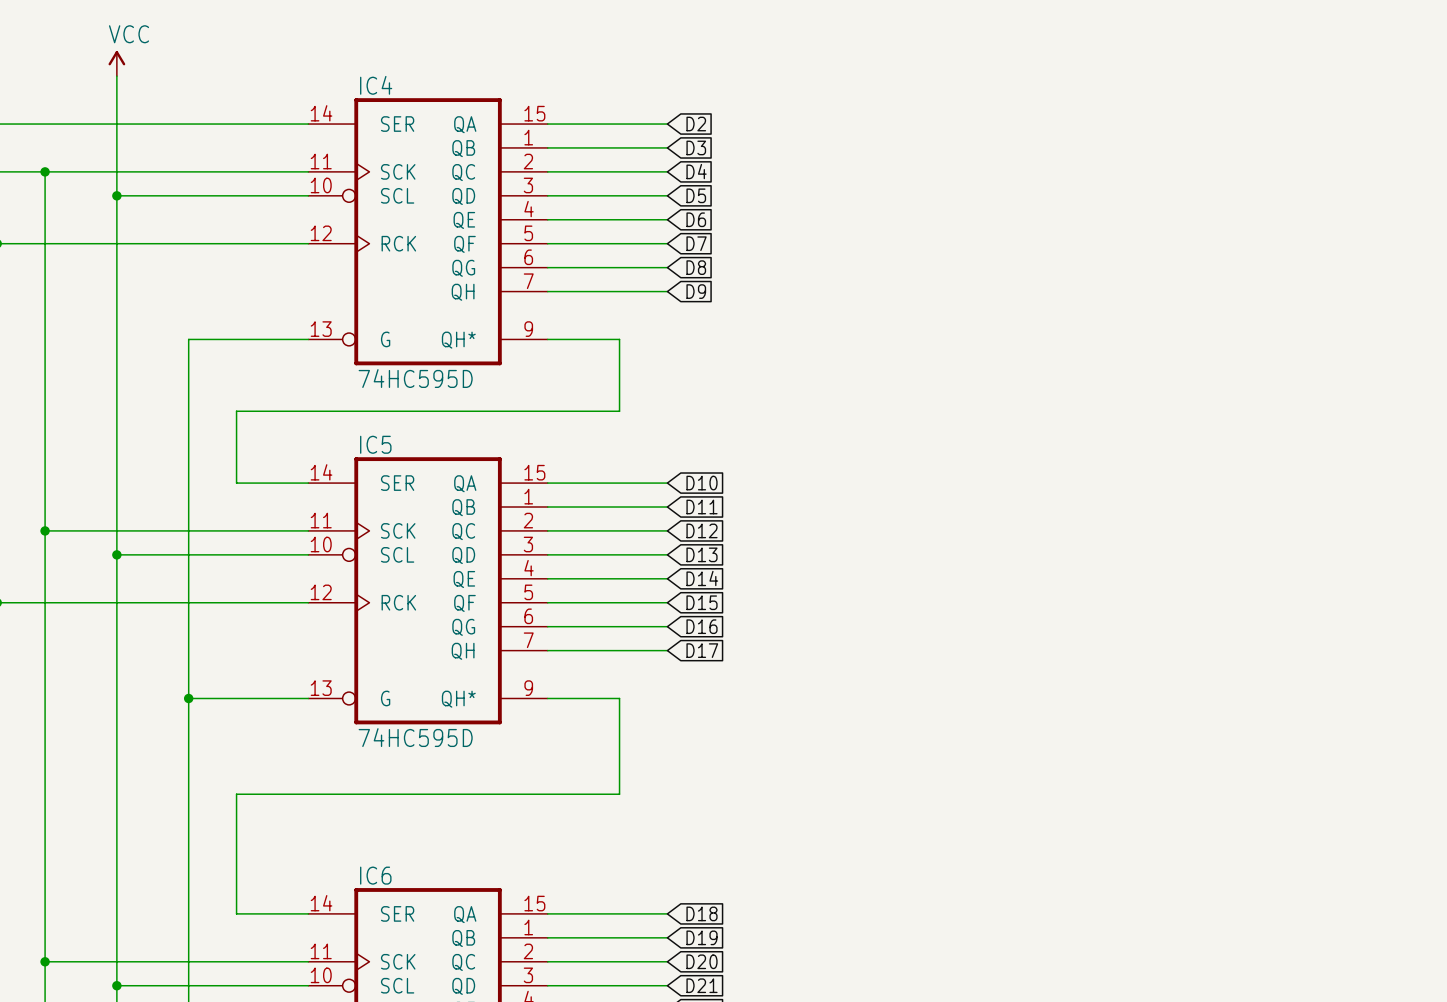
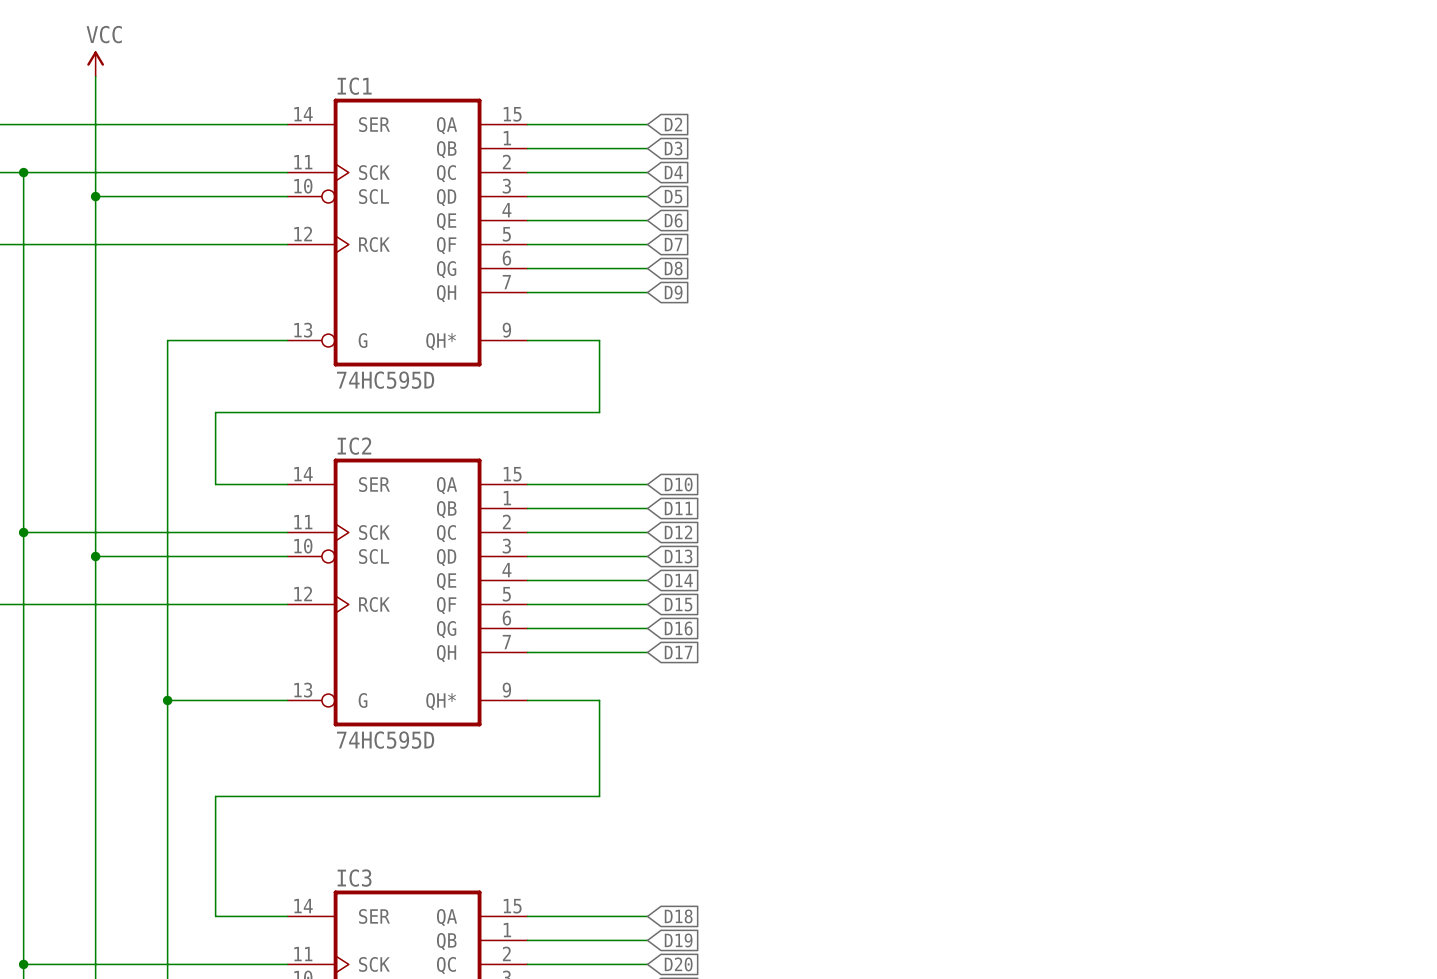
IC4 name: IC4 (376, 85) -> IC1 (354, 86)
IC5 name: IC5 (375, 444) -> IC2 (354, 446)
IC6 name: IC6 (375, 875) -> IC3 (354, 878)

